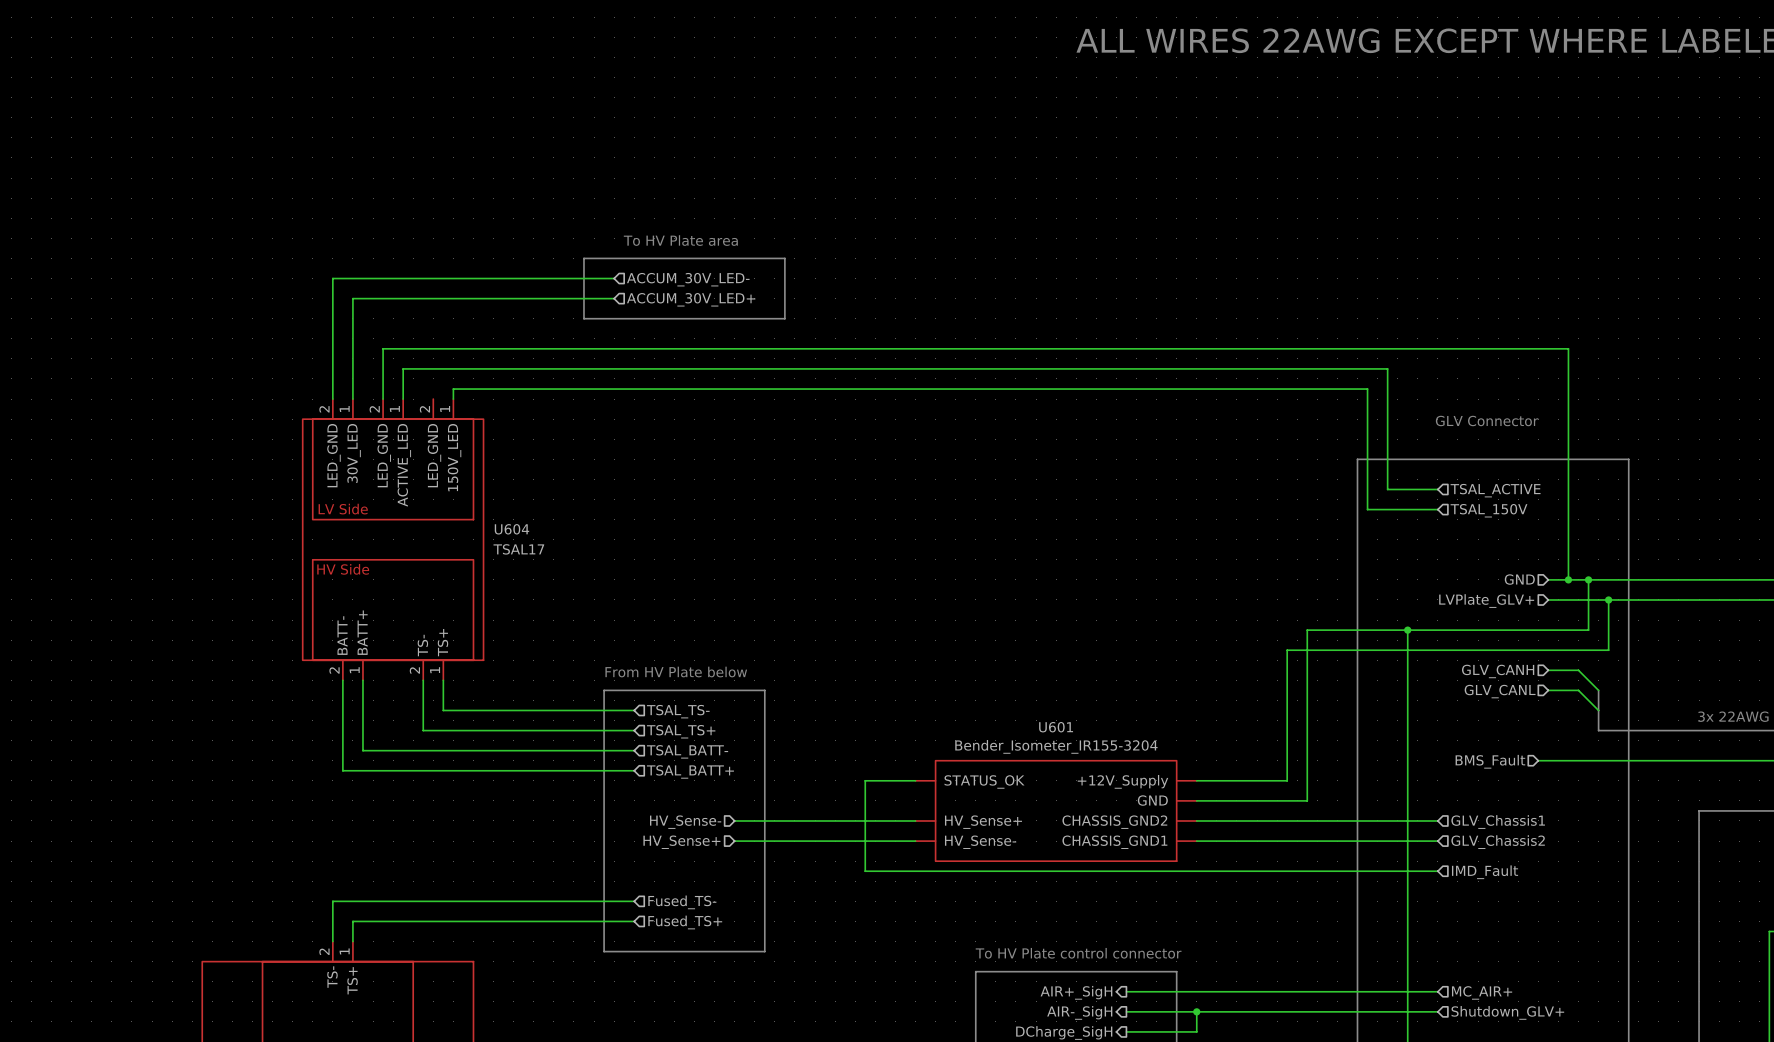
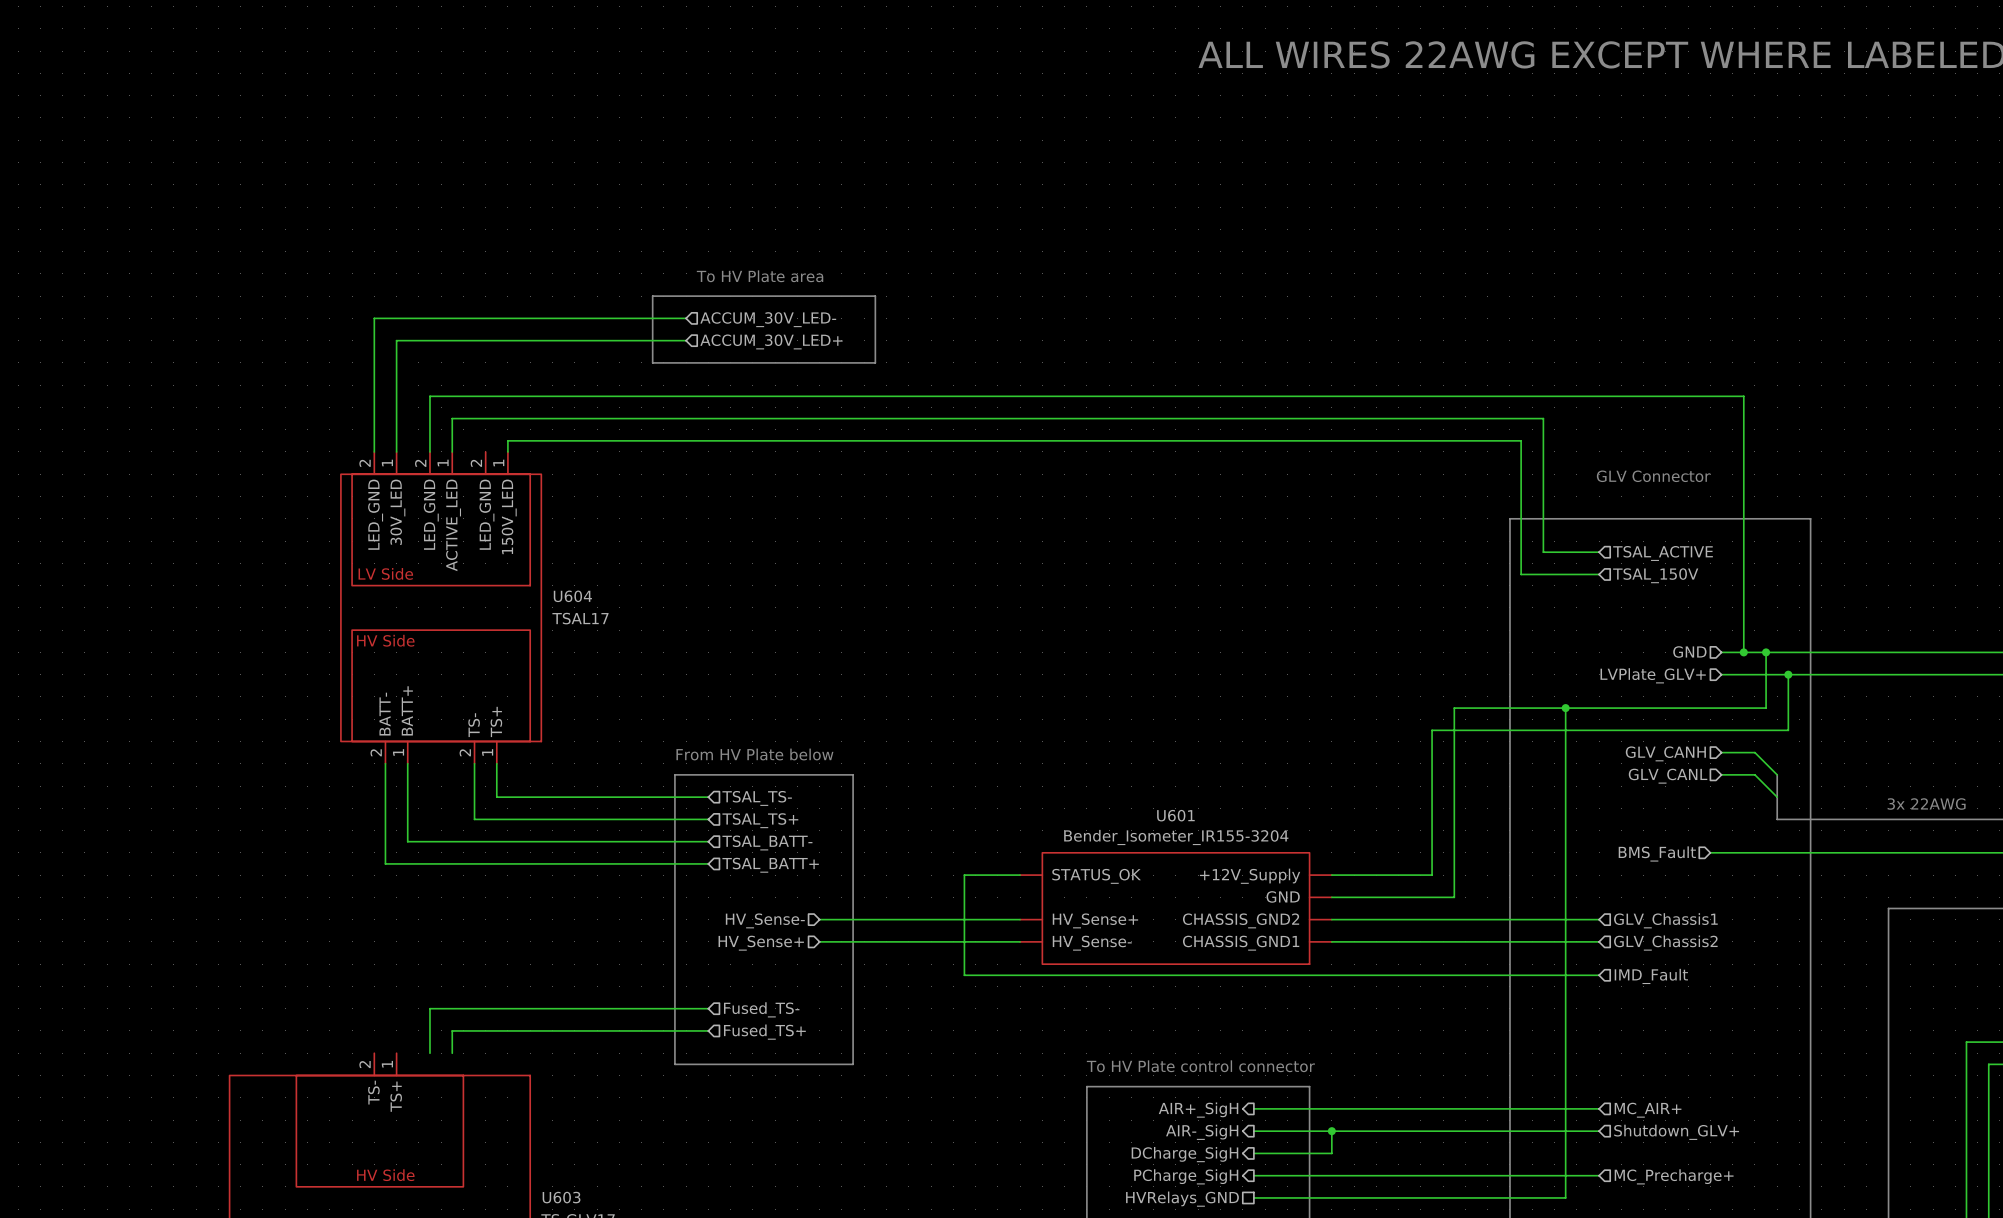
wire: (383, 901) (332, 901) (332, 941) -> (429, 1008) (429, 1053)
wire: (403, 921) (352, 921) (352, 941) -> (452, 1030) (452, 1053)

